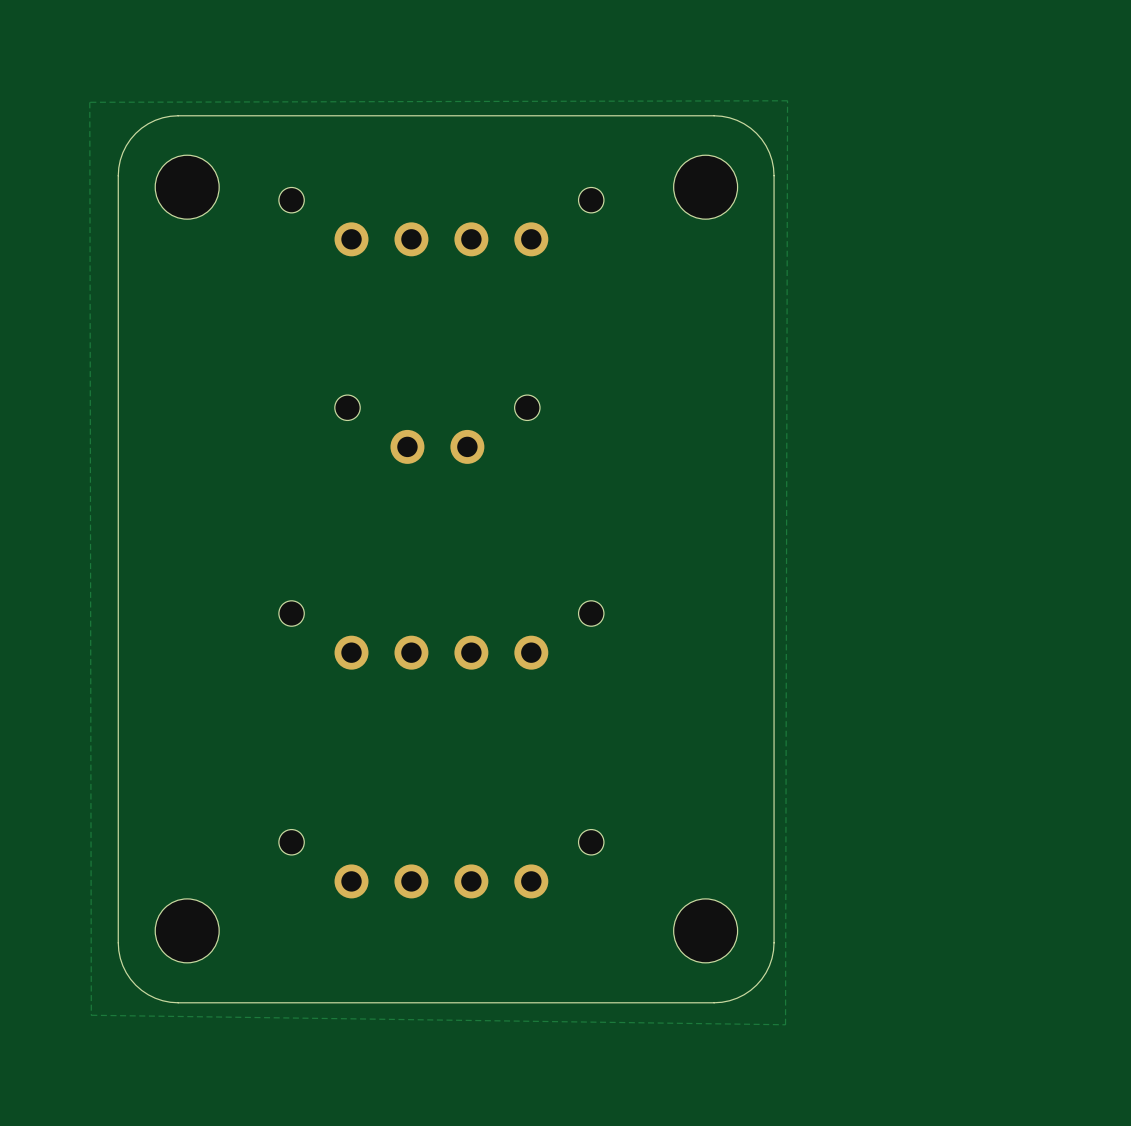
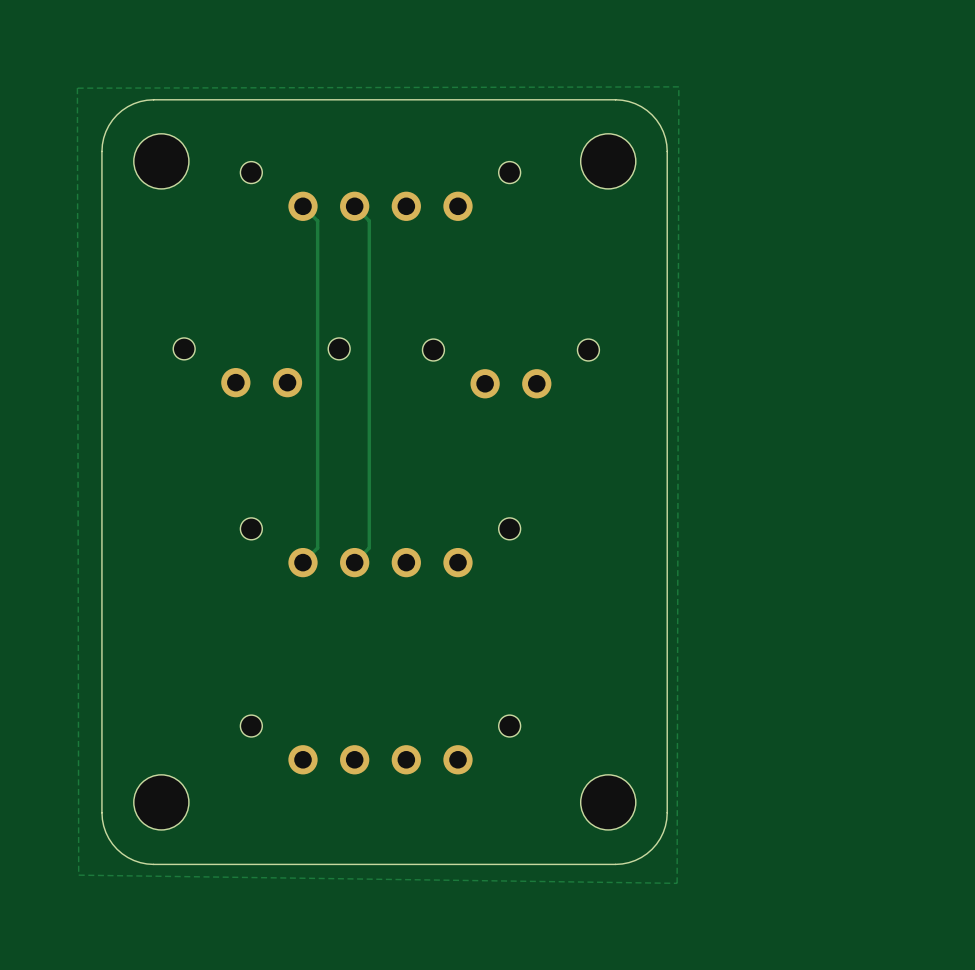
track: none -> (303, 206) (317, 220) (317, 547) (303, 562)
track: none -> (354, 206) (369, 220) (369, 547) (354, 562)
part: none -> (261, 367)
part: none -> (510, 368)
part: (437, 429) -> none

